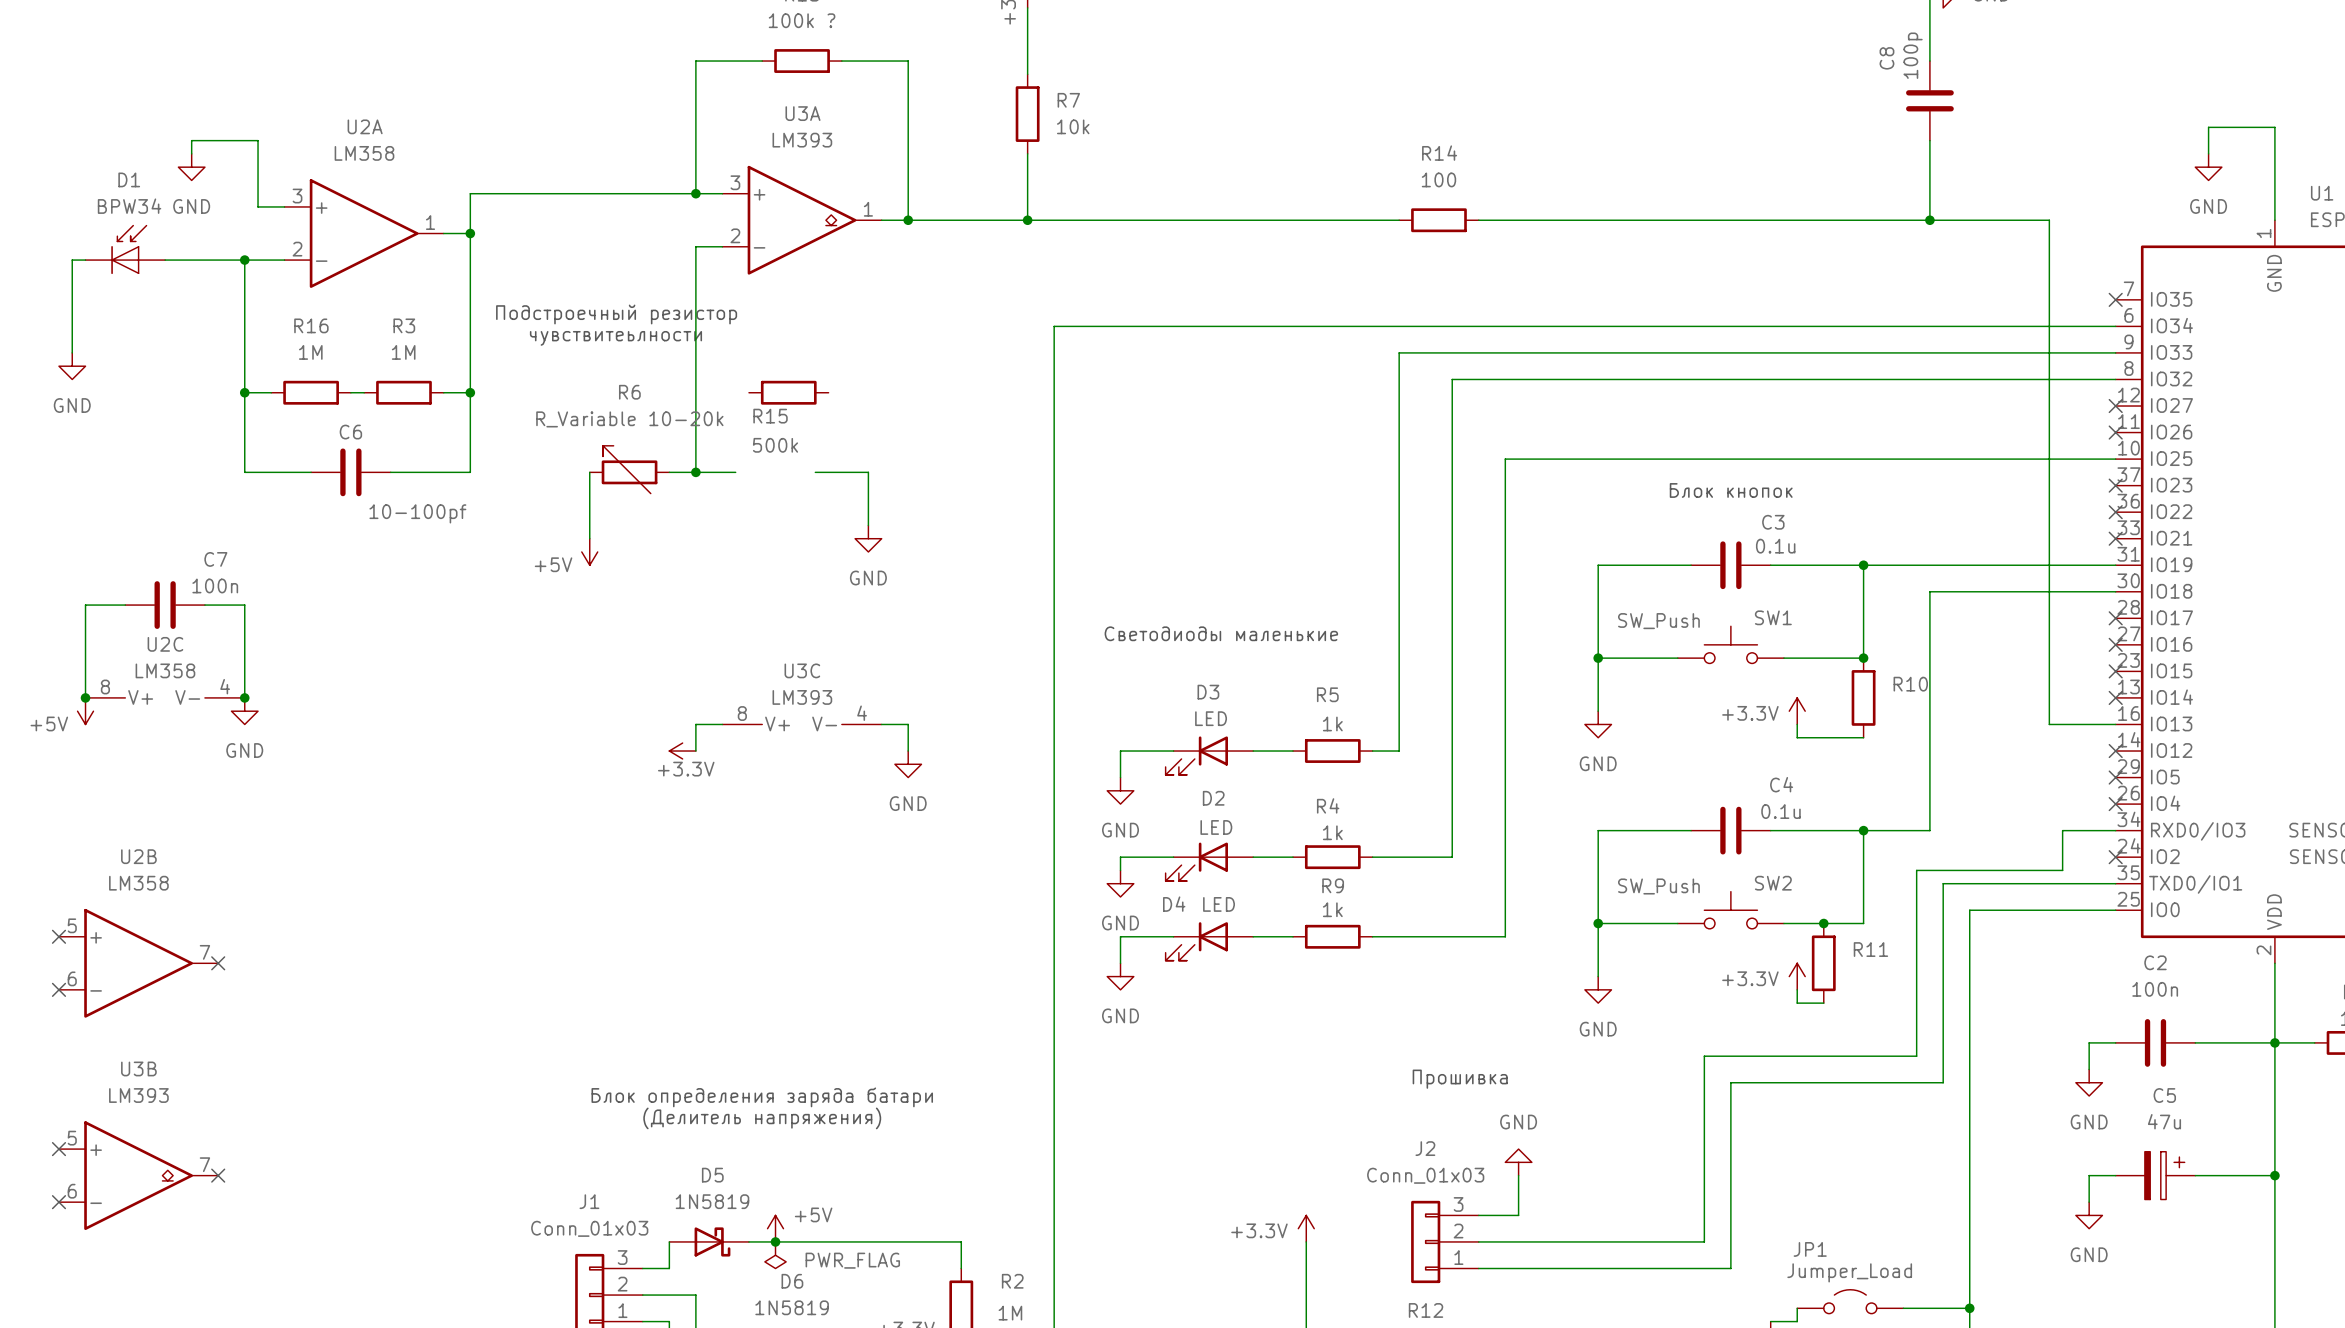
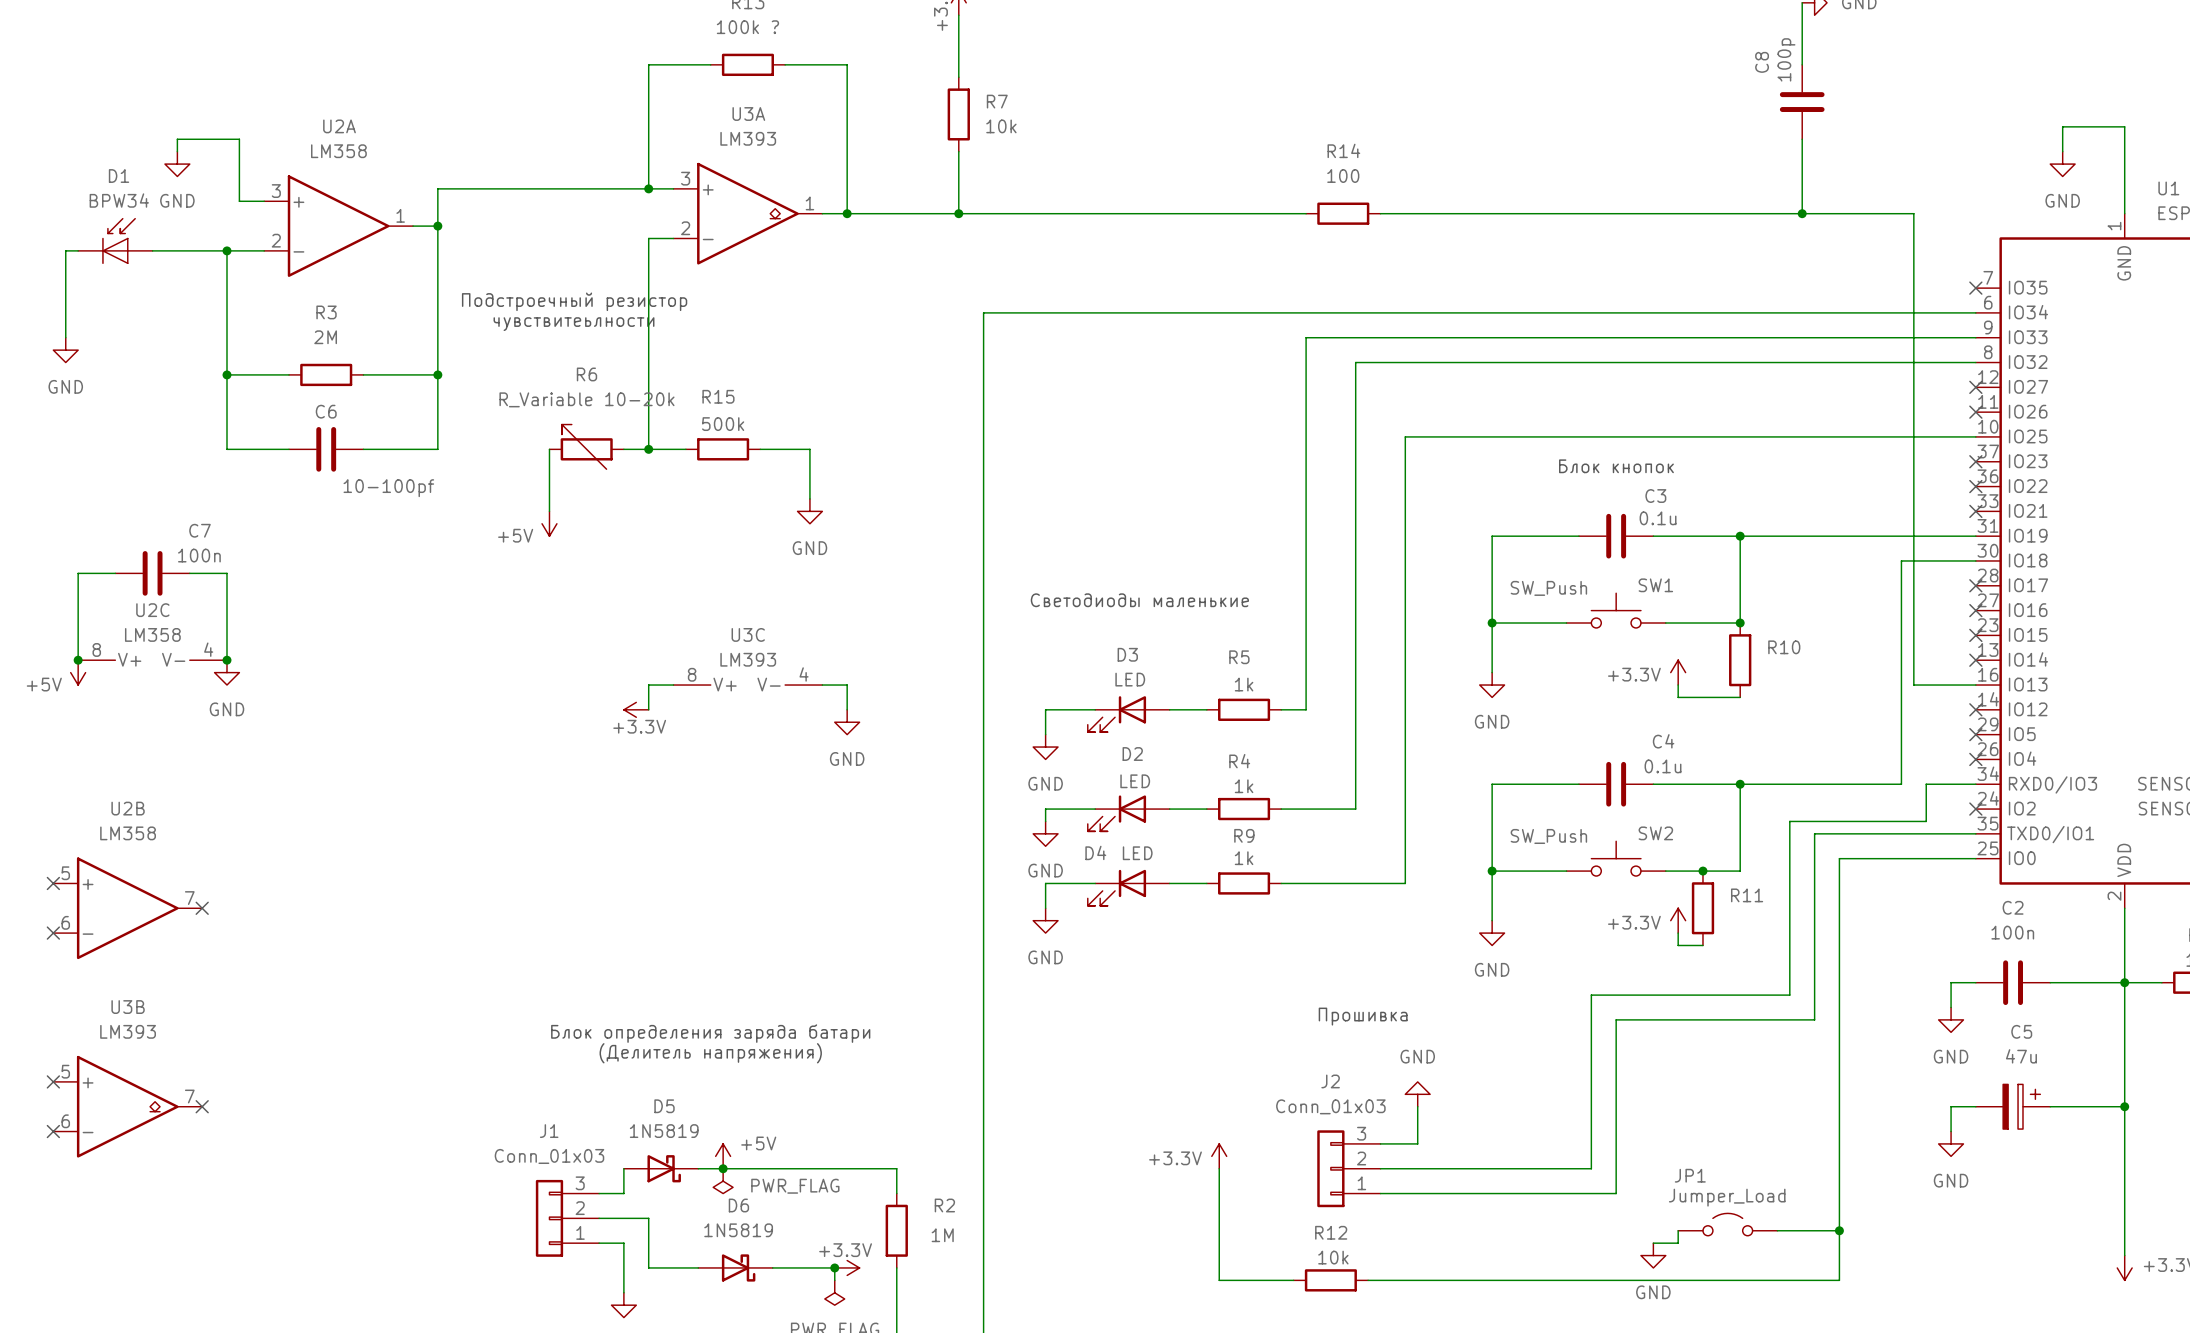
R3 value: 1М (403, 352) -> 2M (325, 337)
wire: none -> (251, 374) (289, 374)
R16: 1М (311, 392) -> none
wire: (350, 392) (364, 392) -> none
wire: none -> (363, 374) (413, 374)
R3 position: (403, 392) -> (326, 374)
R15 position: (788, 392) -> (723, 449)
wire: (2036, 591) (1929, 591) (1929, 830) -> (1901, 560) (1901, 784) (1802, 784)

